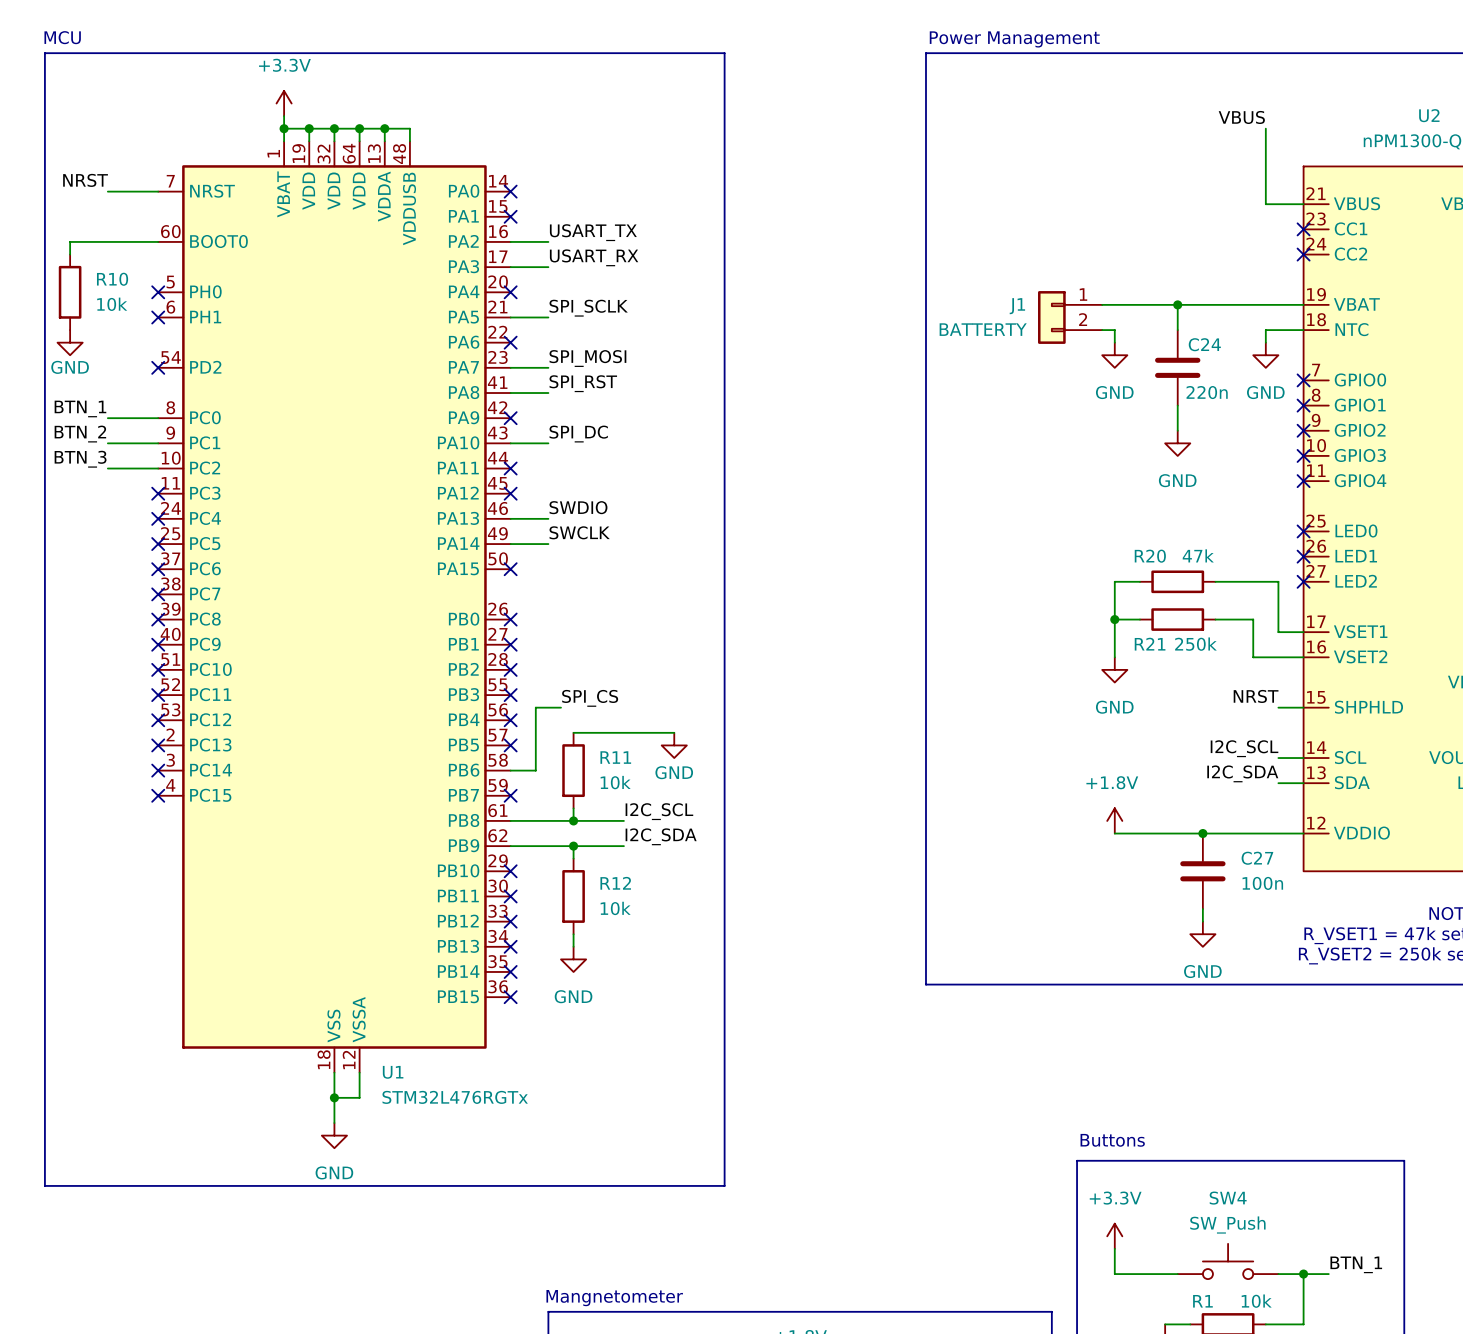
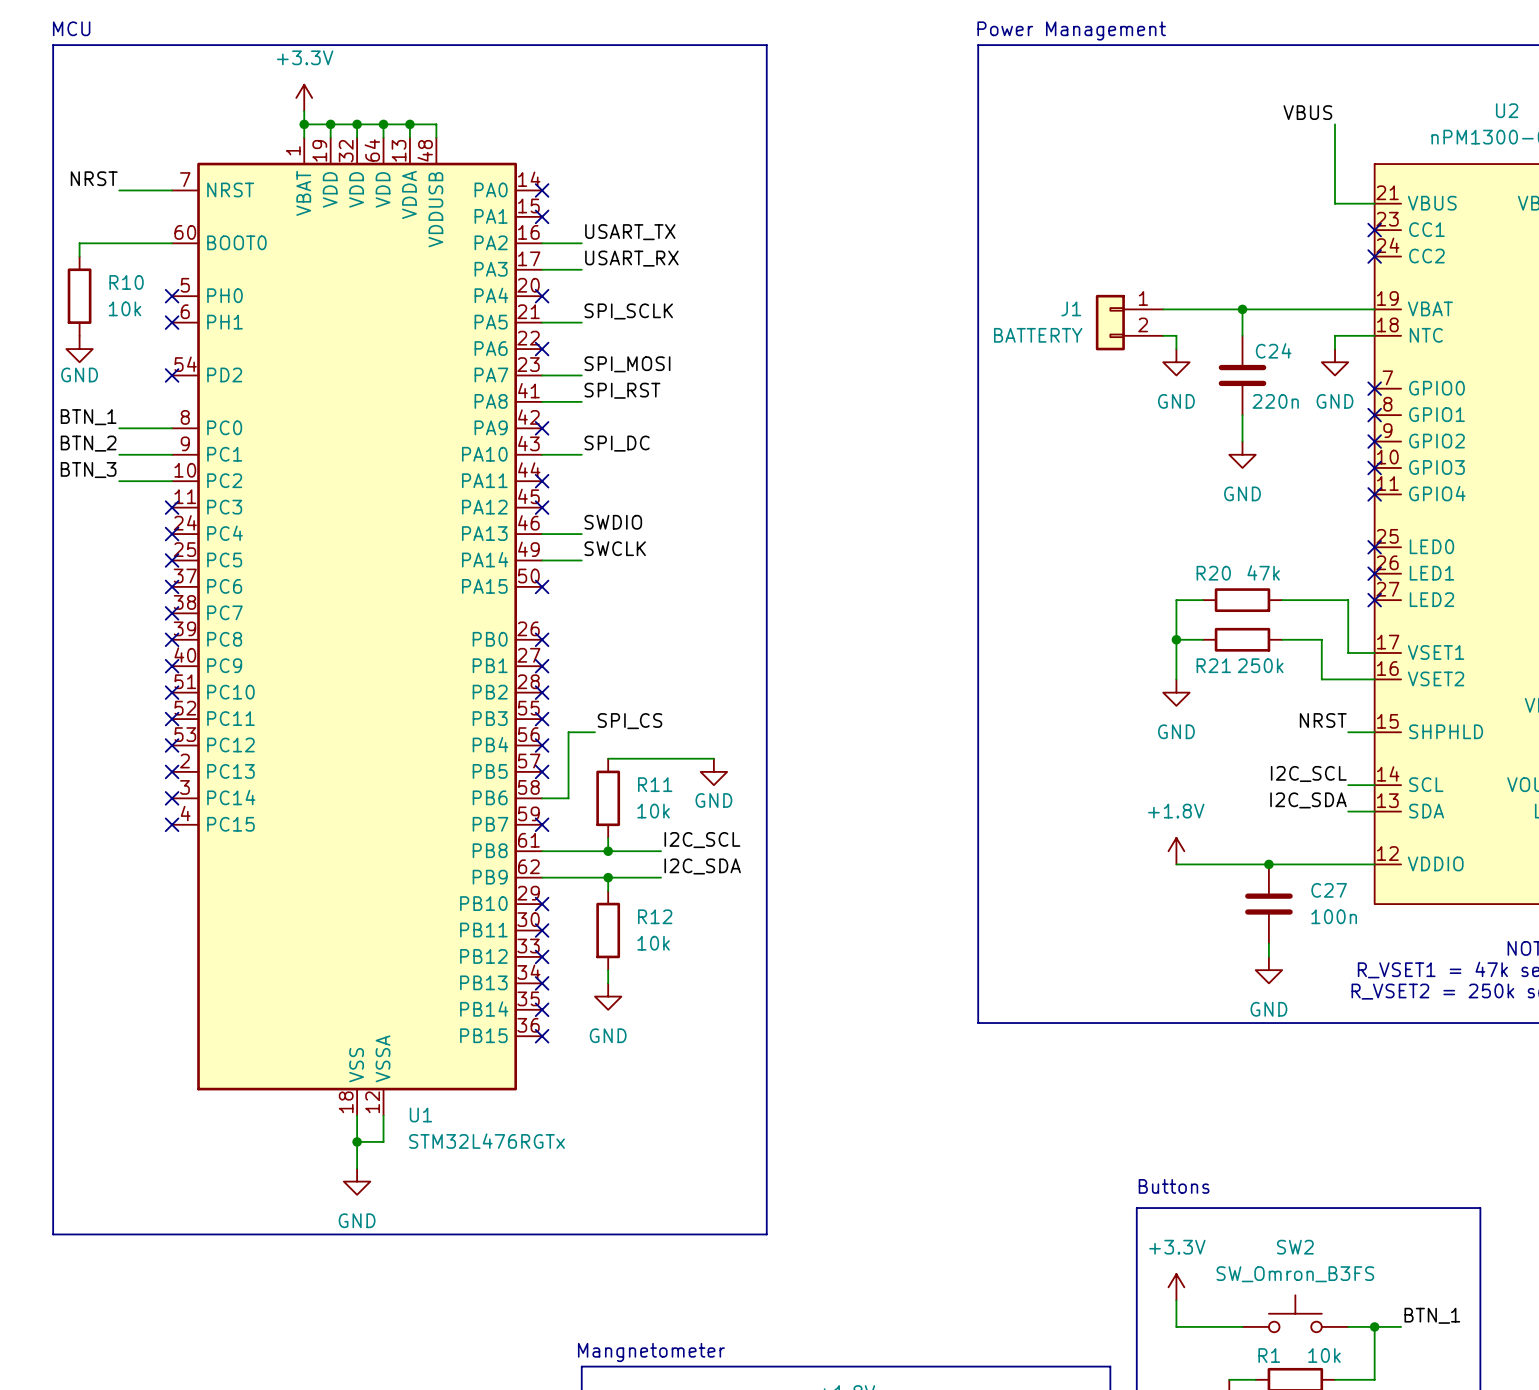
SW4 name: SW4 (1228, 1198) -> SW2 (1295, 1247)
SW4 value: SW_Push (1227, 1225) -> SW_Omron_B3FS (1295, 1274)

